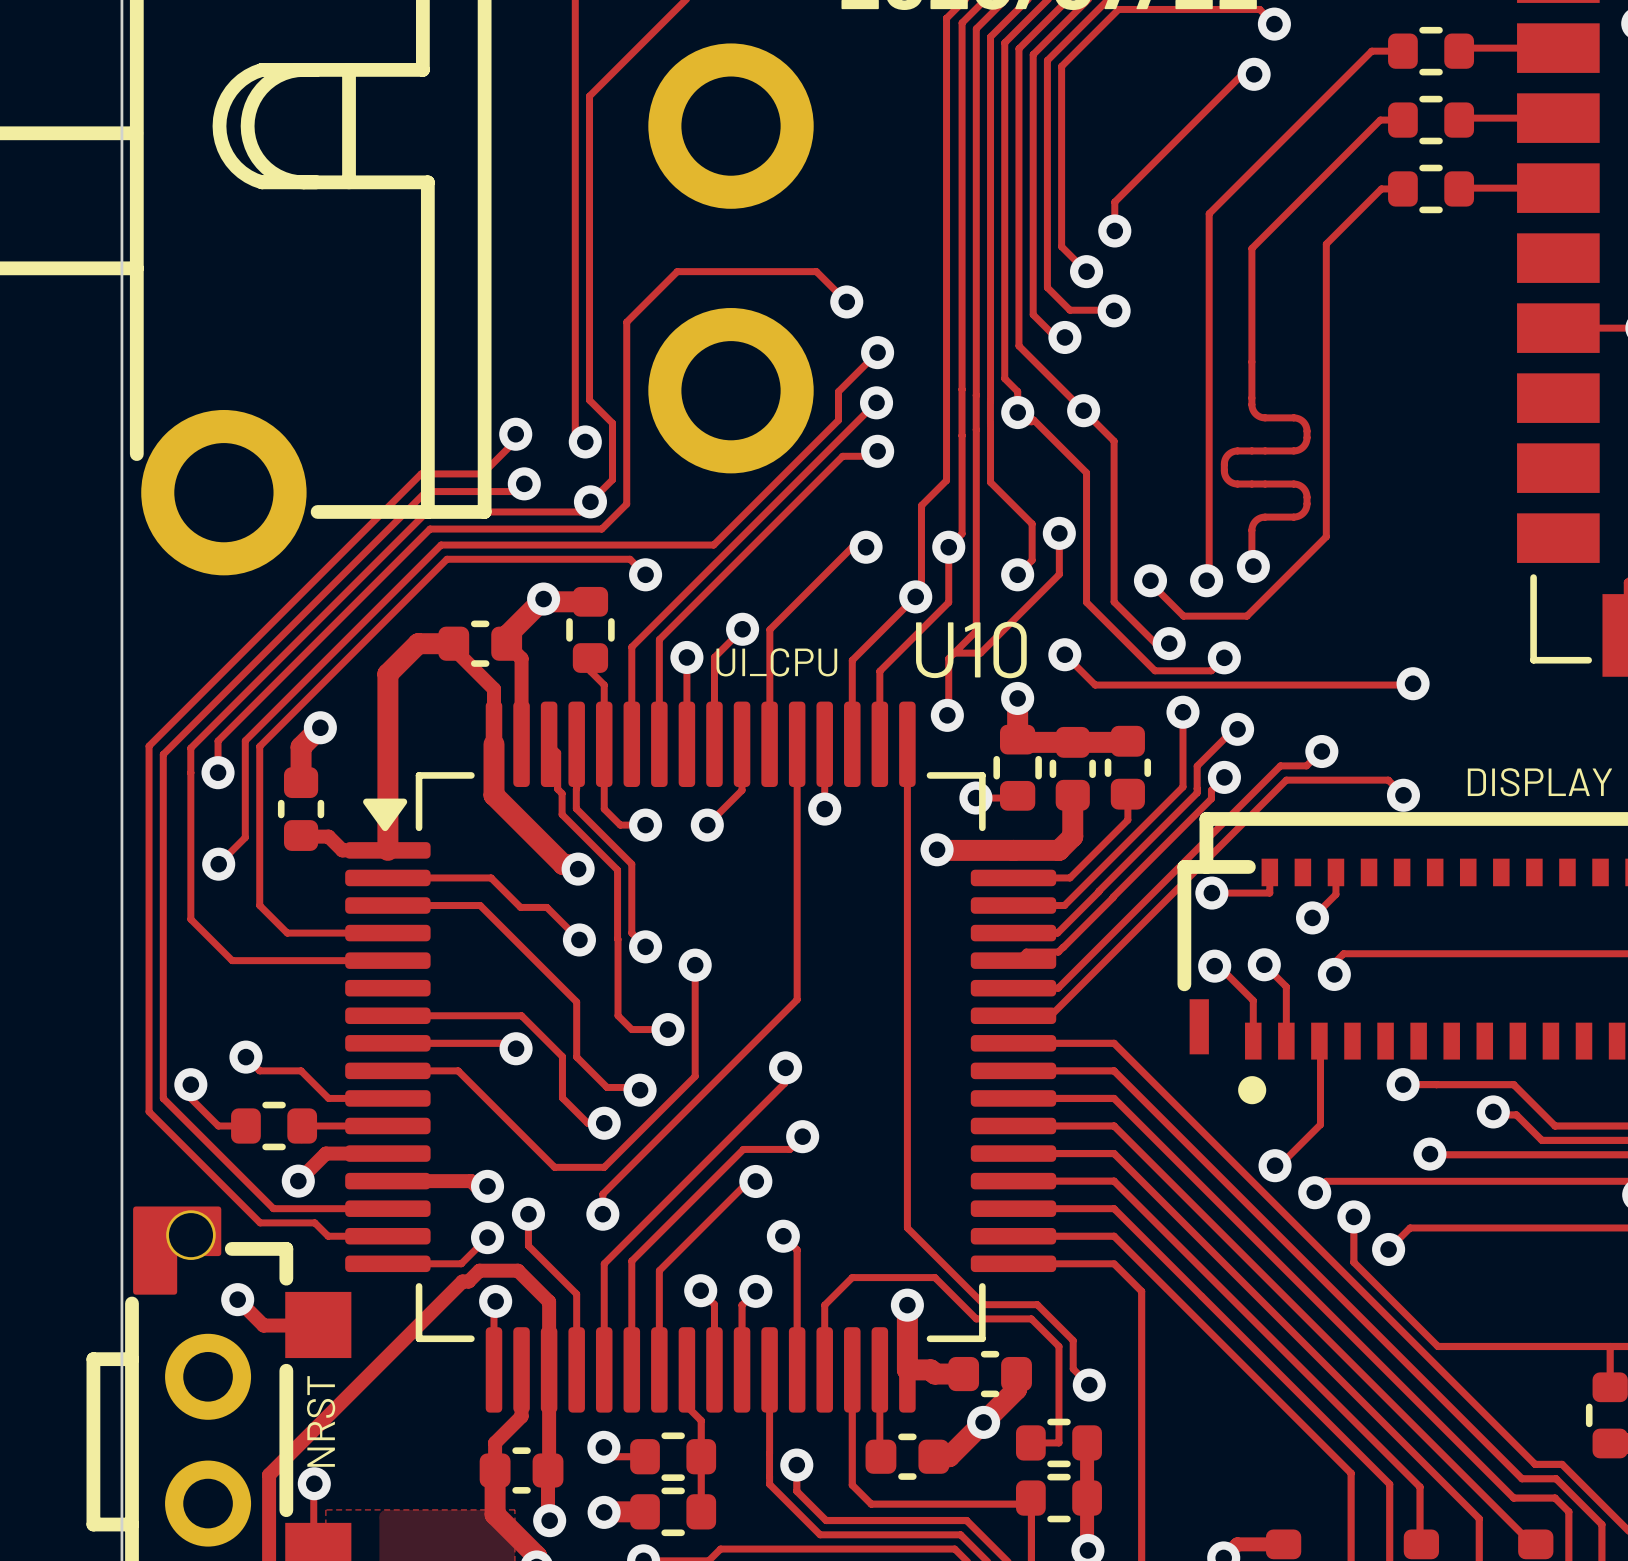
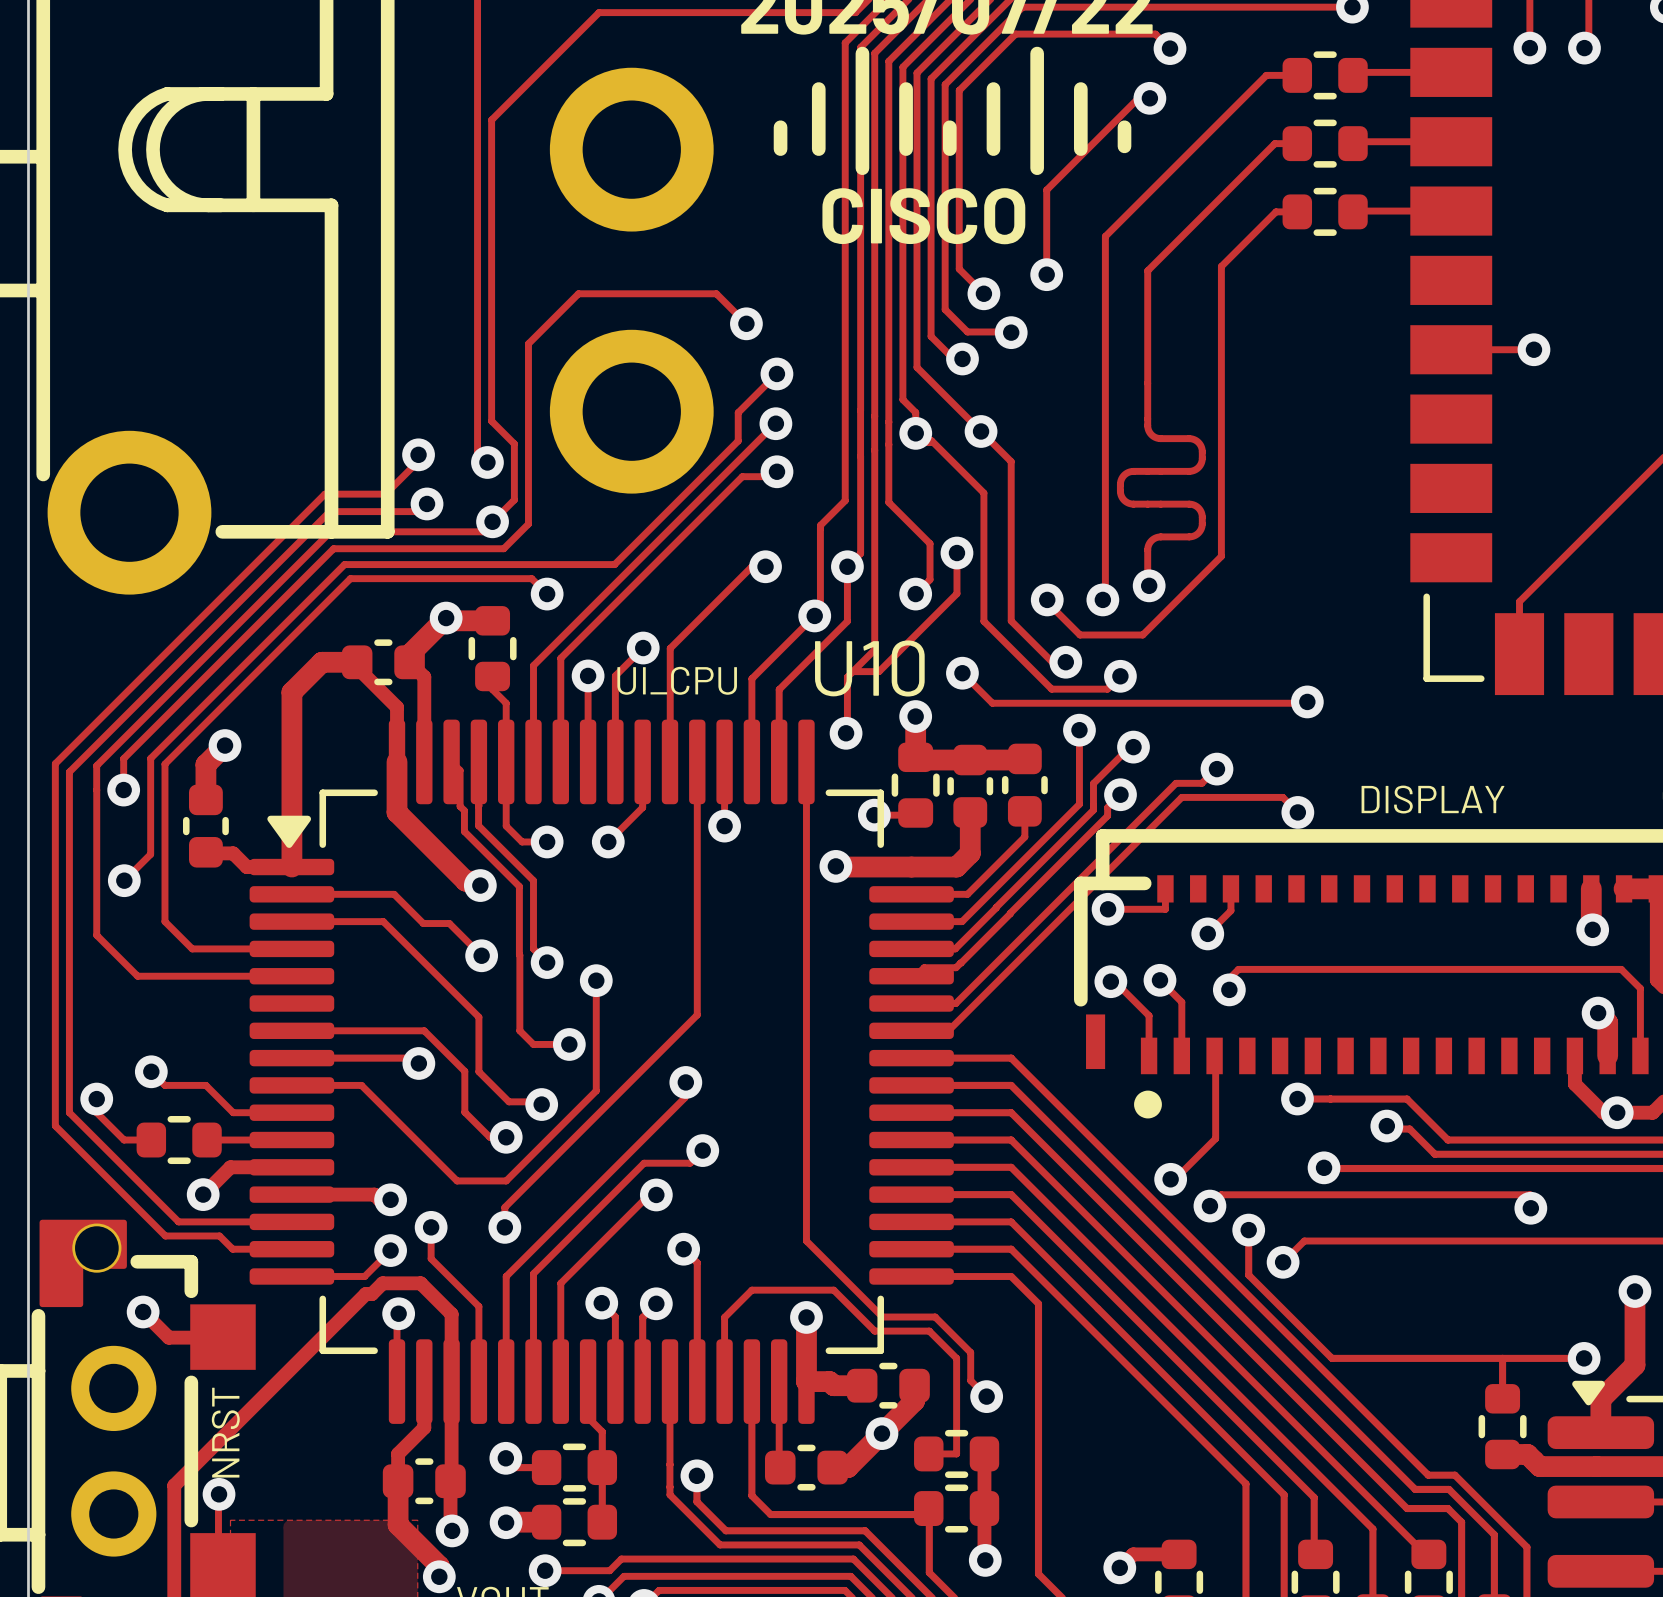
line: none -> (862, 53) (862, 168)
line: none -> (1037, 53) (1037, 168)
line: none -> (818, 89) (818, 149)
line: none -> (906, 89) (906, 149)
line: none -> (993, 89) (993, 149)
line: none -> (1080, 89) (1080, 149)
line: none -> (780, 127) (780, 149)
line: none -> (949, 127) (949, 149)
line: none -> (1124, 127) (1124, 146)
track: (1149, 166) (1114, 202) (1114, 230) -> (1046, 190) (1046, 274)
text: none -> CISCO (923, 216)
via position: (1114, 230) -> (1046, 274)

